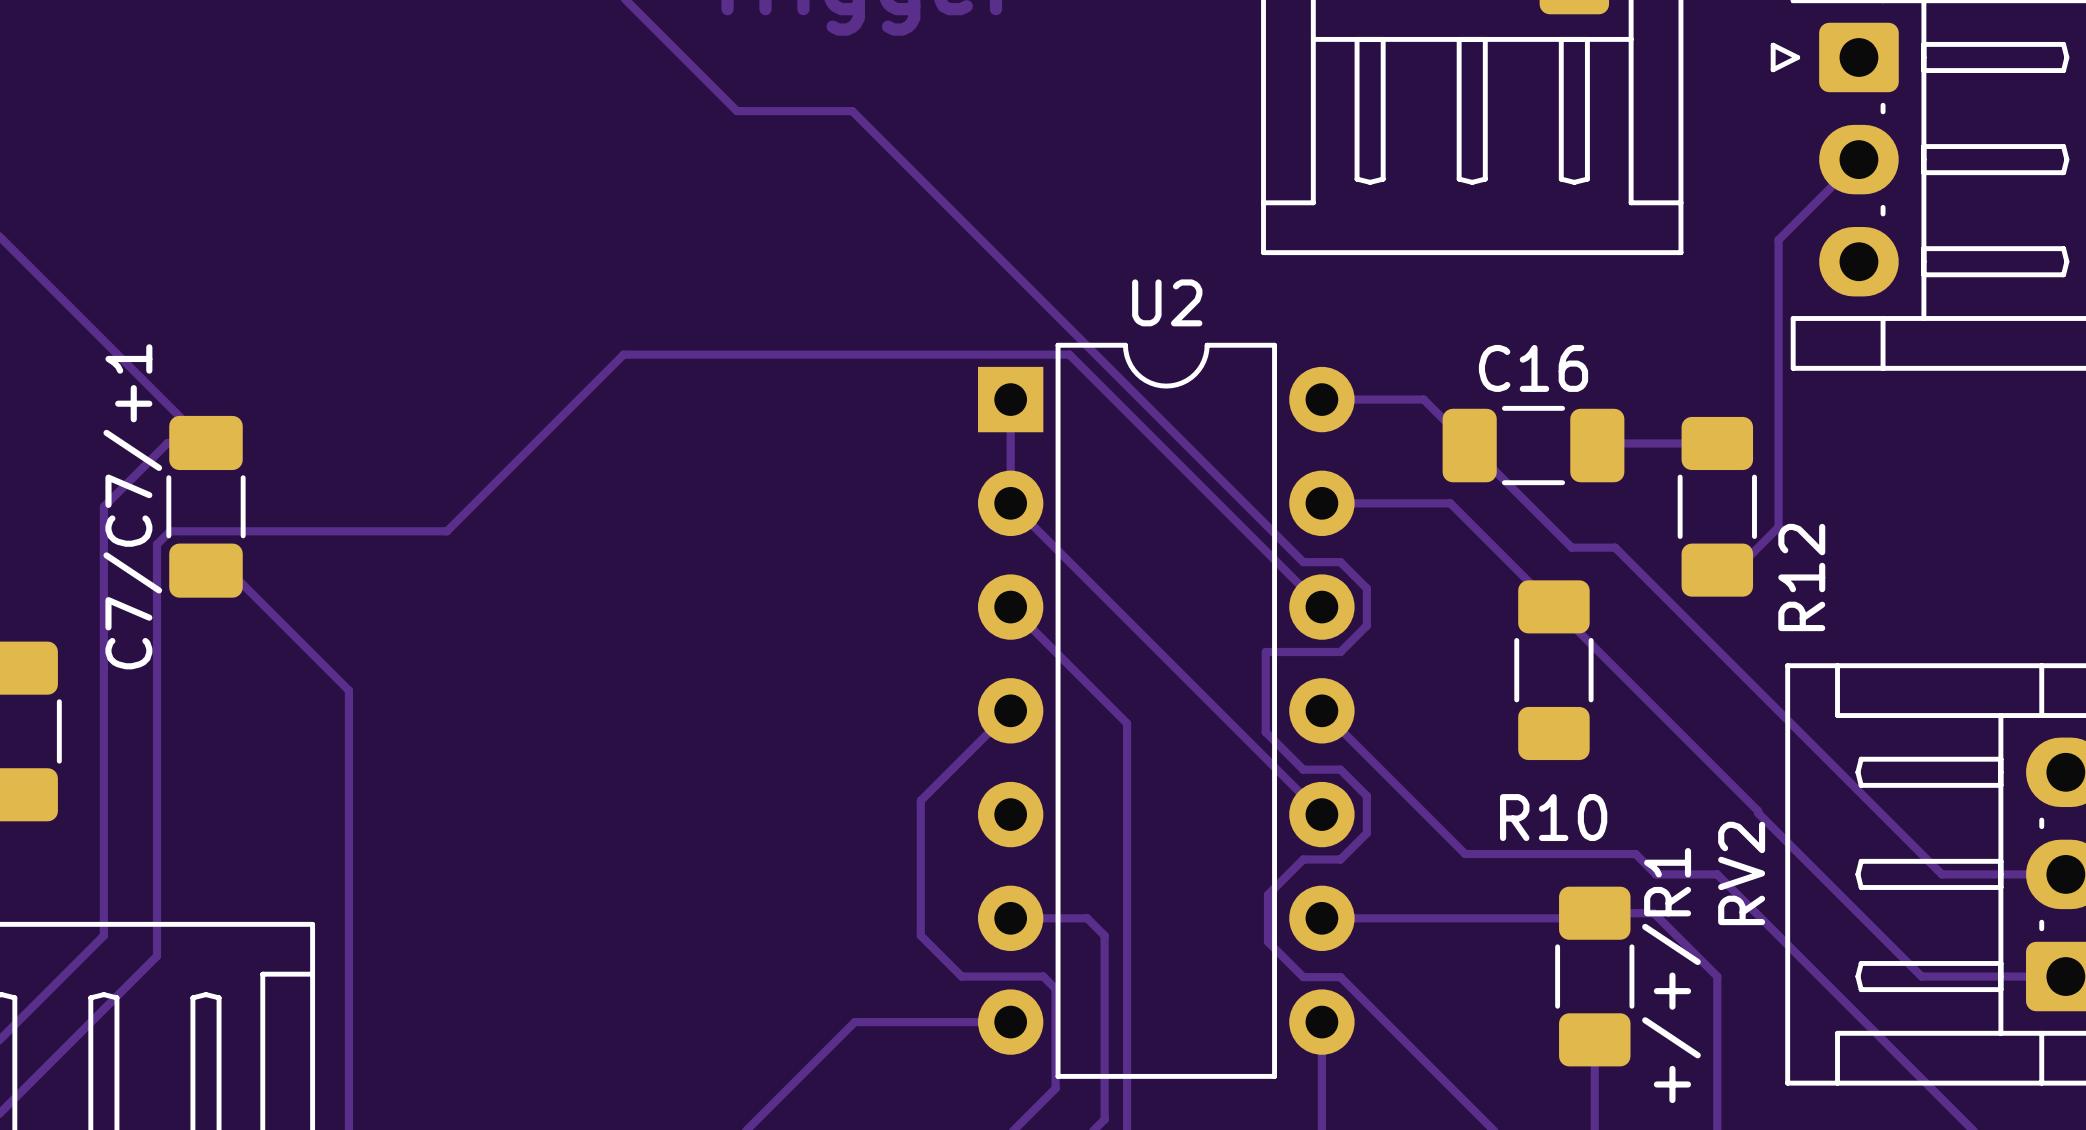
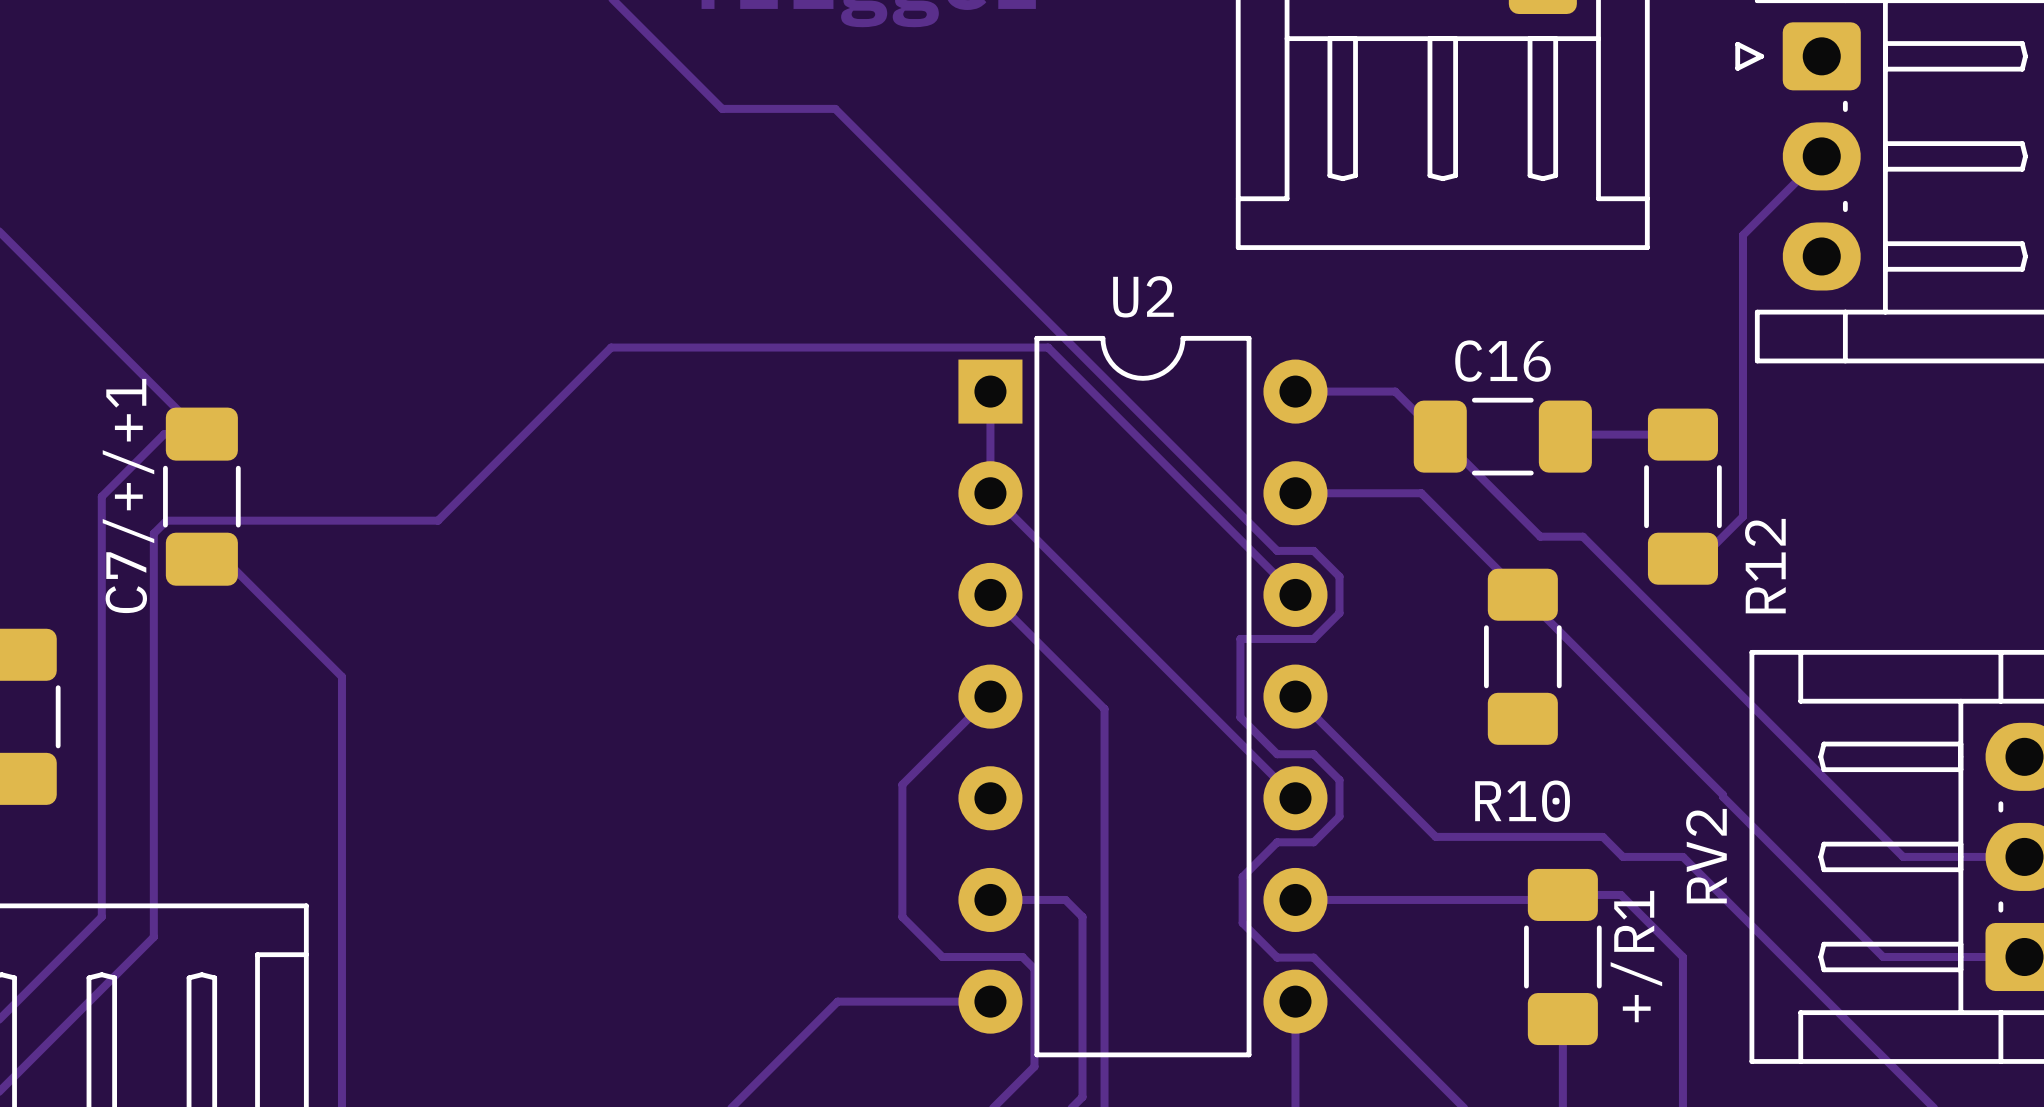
C7/C7/+1 name: C7/C7/+1 (132, 506) -> C7/+/+1 (128, 496)
+/+/R1 name: +/+/R1 (1671, 975) -> +/R1 (1636, 956)

